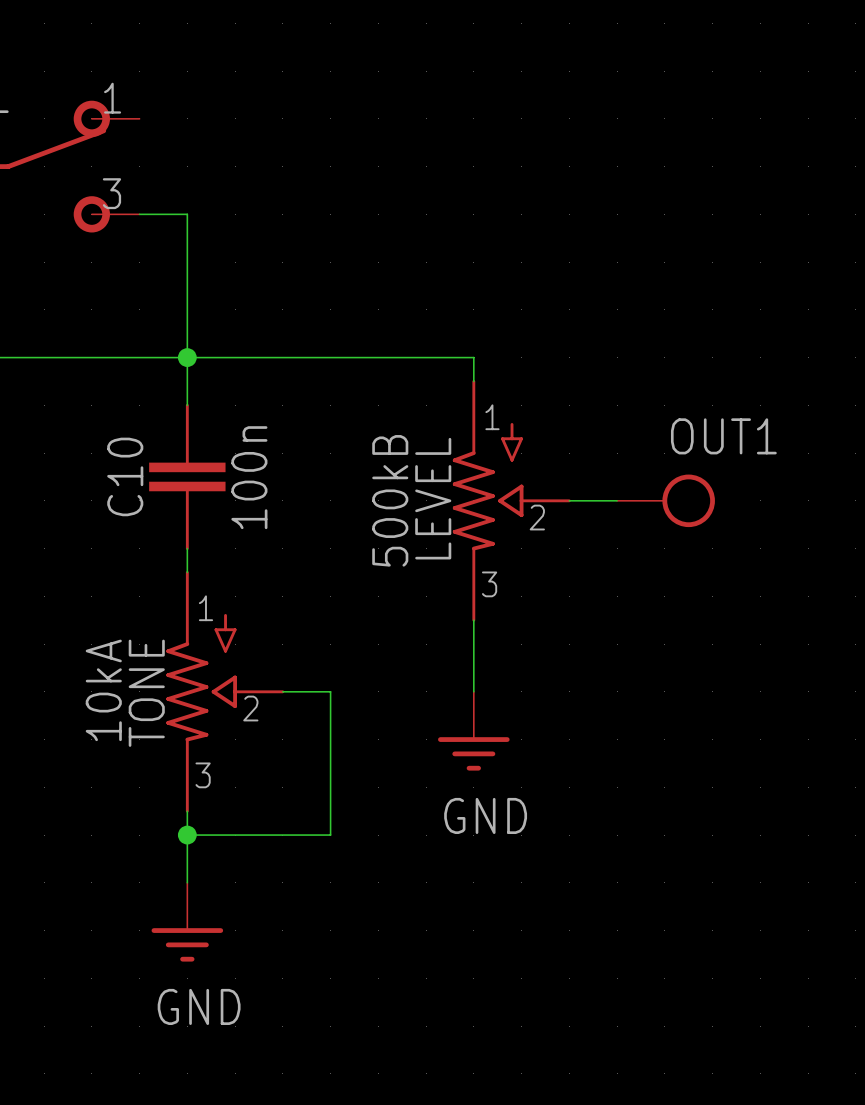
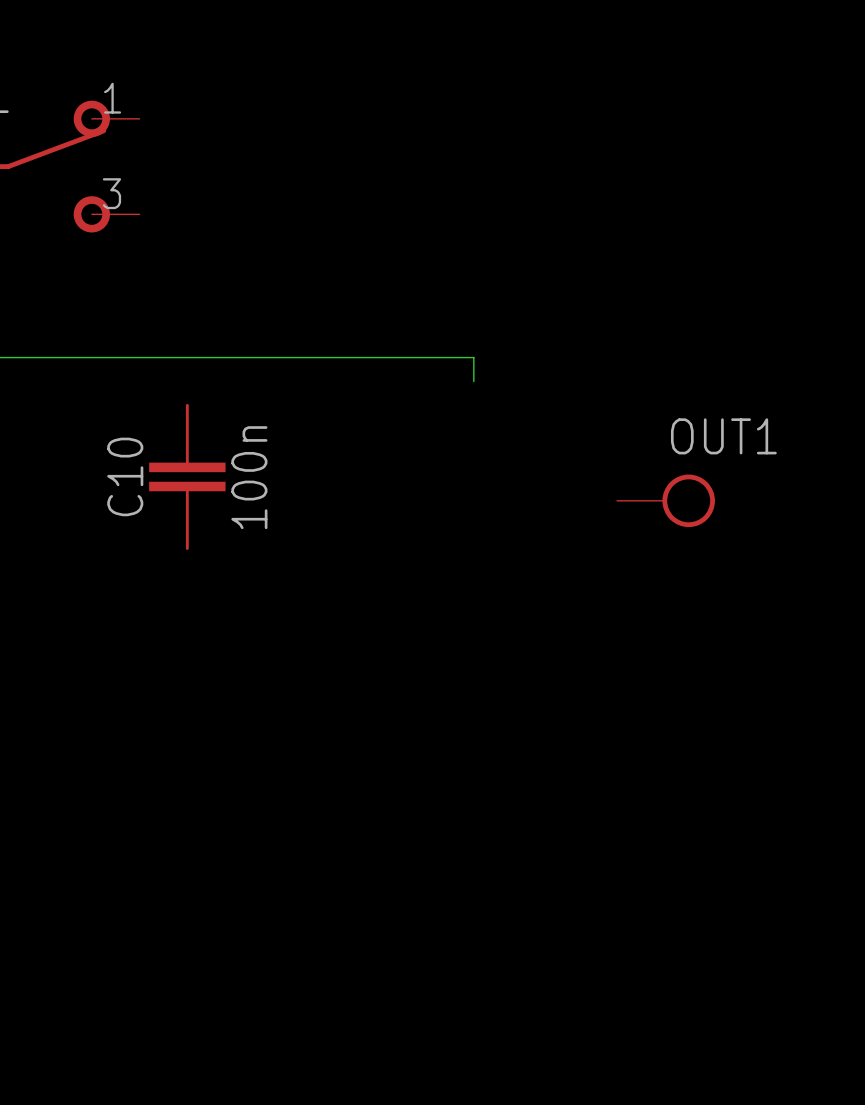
wire: (139, 214) (187, 214) (187, 405) -> none
junction: (187, 357) -> none
LEVEL: 500kB (511, 500) -> none
wire: (569, 500) (617, 500) -> none
wire: (187, 548) (187, 572) -> none
wire: (473, 620) (473, 691) -> none
TONE: 10kA (225, 691) -> none
wire: (282, 691) (330, 691) (330, 835) (187, 835) -> none
power symbol: GND (473, 731) -> none
wire: (187, 811) (187, 882) -> none
junction: (187, 835) -> none
power symbol: GND (187, 922) -> none

